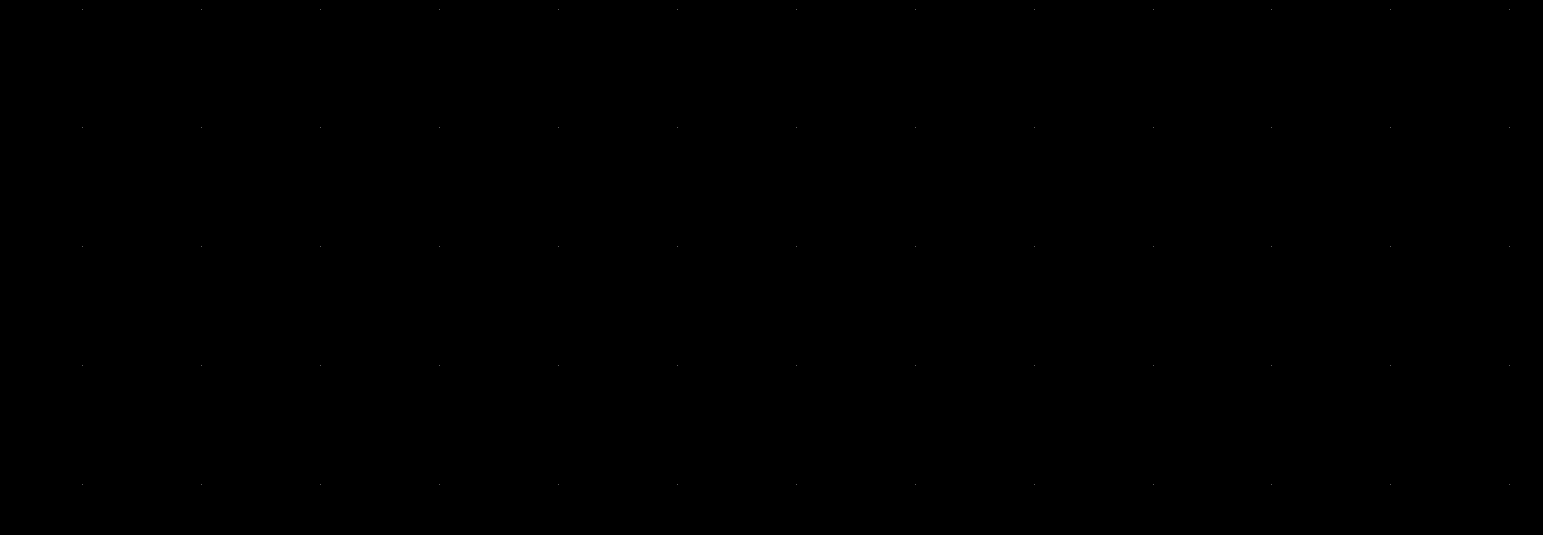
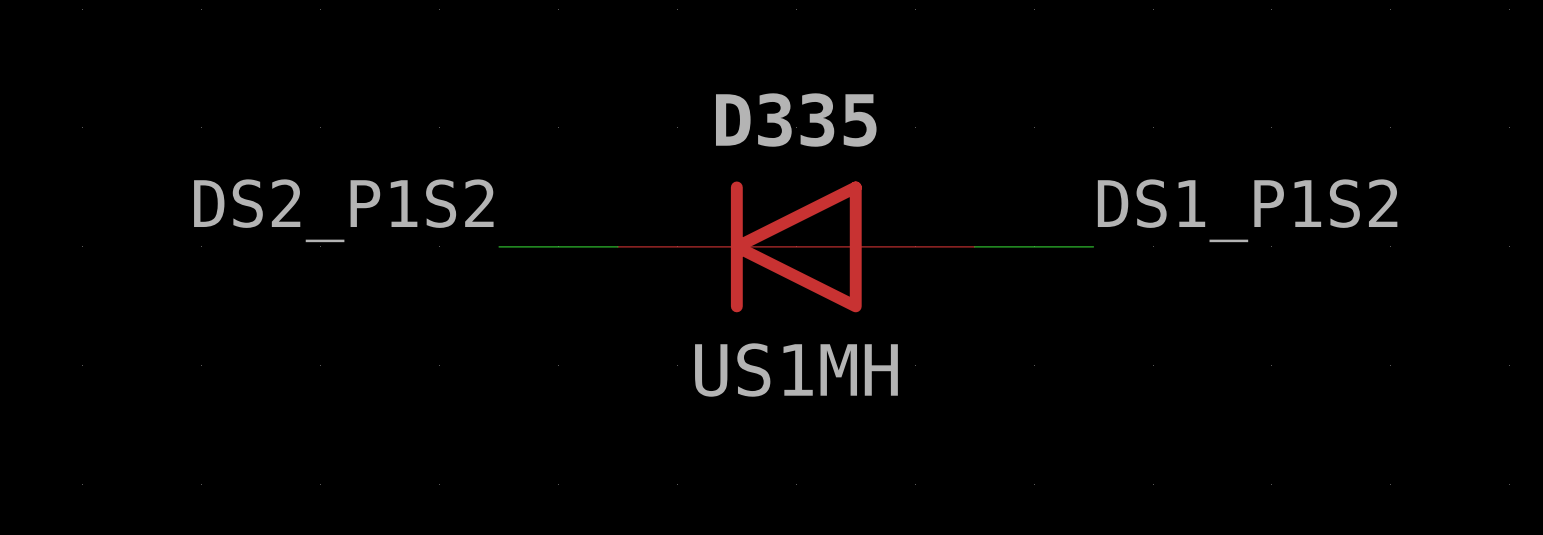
label: none -> DS2_P1S2 (343, 210)
label: none -> DS1_P1S2 (1247, 210)
wire: none -> (499, 246) (617, 246)
D335: none -> US1MH (796, 246)
wire: none -> (974, 246) (1093, 246)

